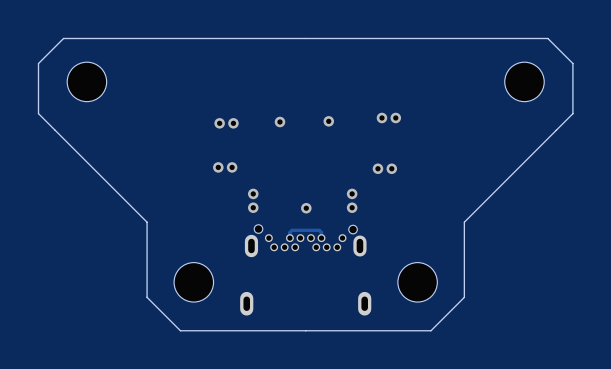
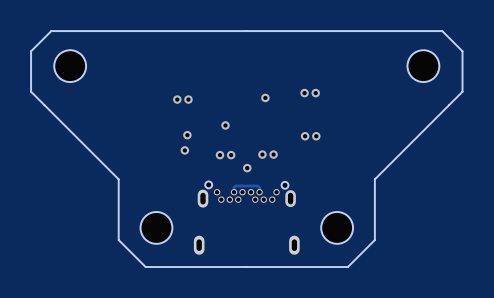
via: none -> (304, 93)
via: none -> (315, 93)
via: (381, 117) -> none
via: (395, 117) -> none
via: (279, 122) -> none
via: none -> (225, 125)
via: (218, 167) -> none
via: none -> (184, 150)
via: none -> (262, 154)
via: none -> (273, 154)
via: none -> (219, 155)
via: none -> (231, 155)
via: (253, 193) -> none
via: (352, 193) -> none
via: (253, 207) -> none
via: (352, 207) -> none

